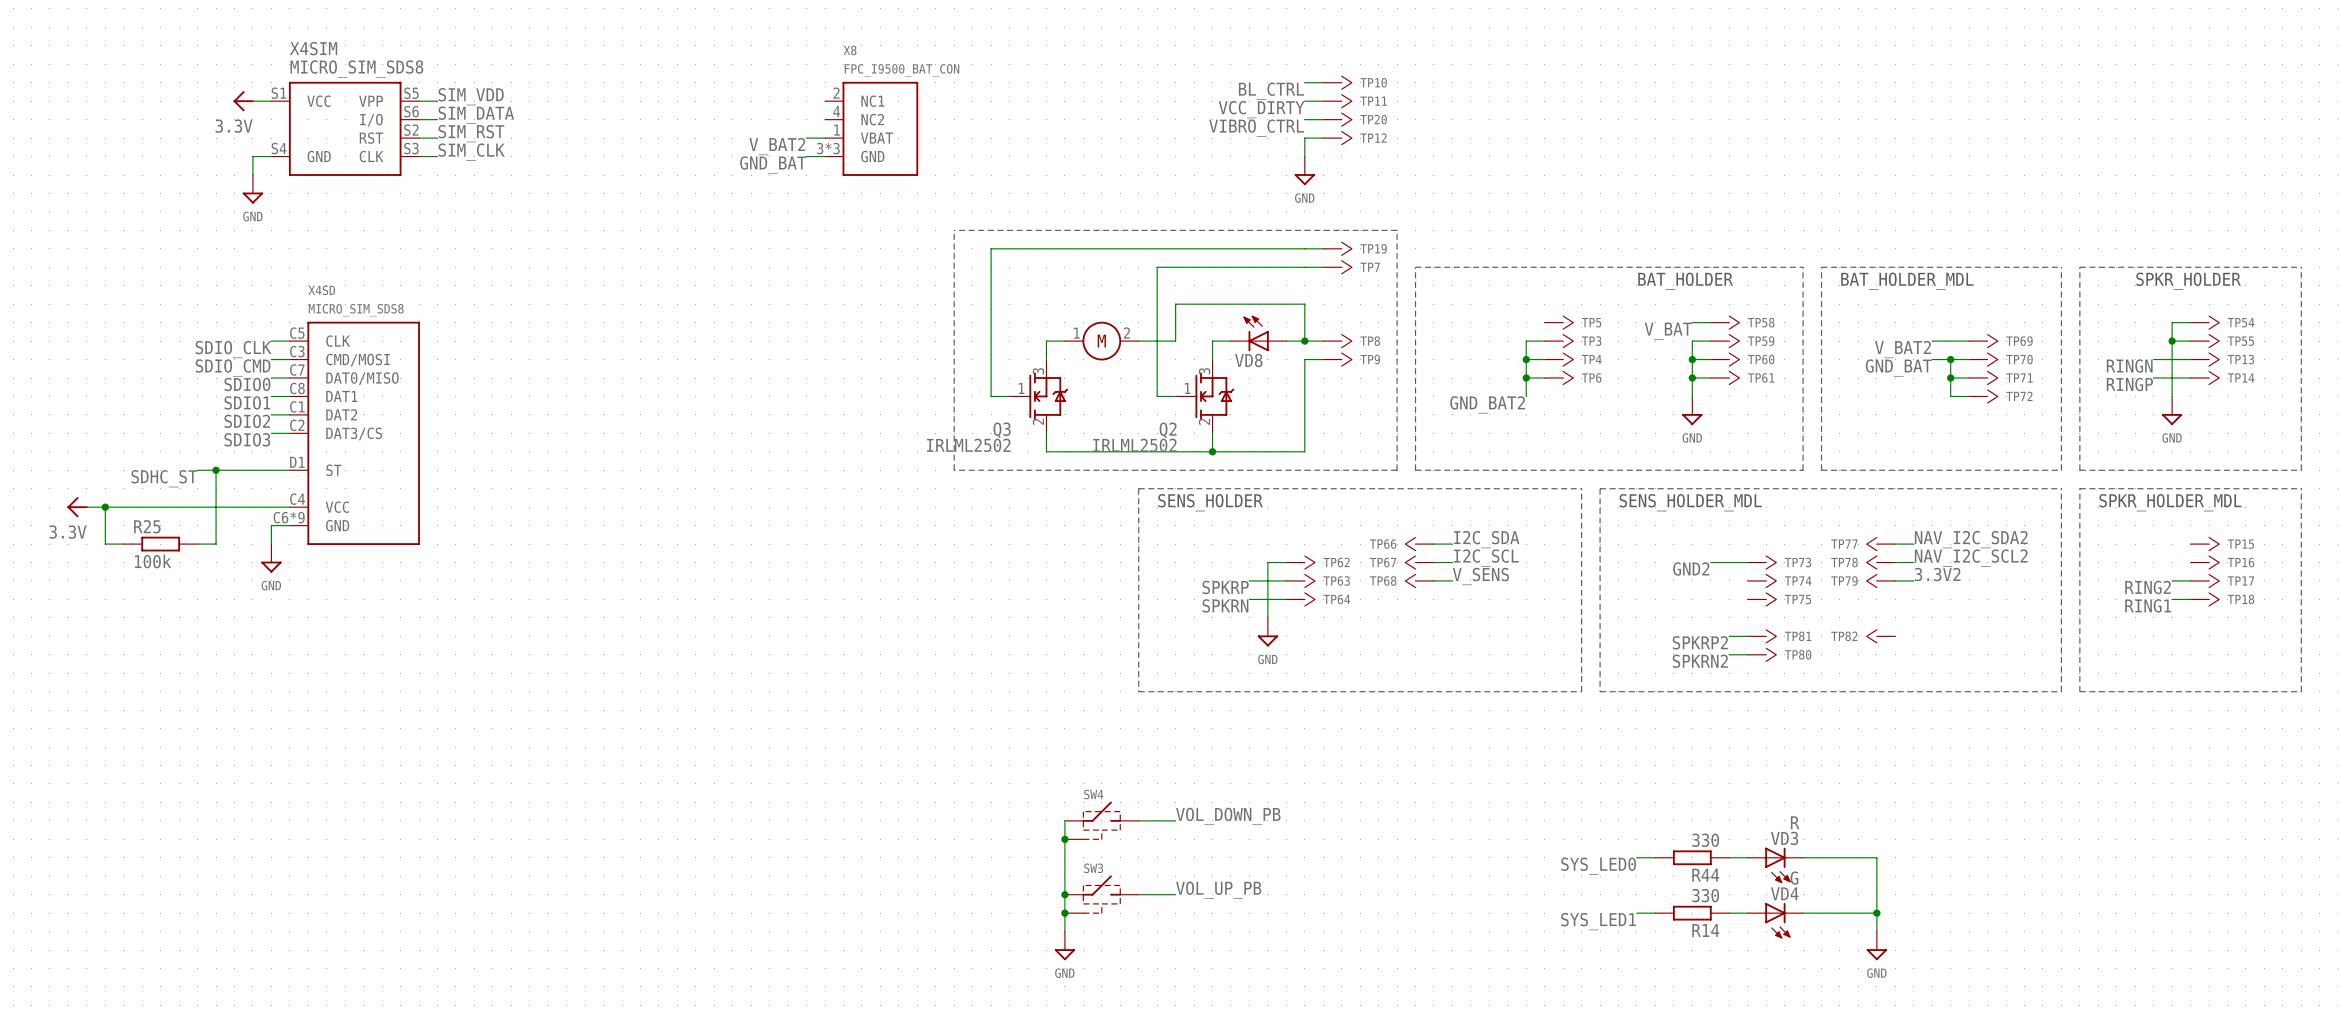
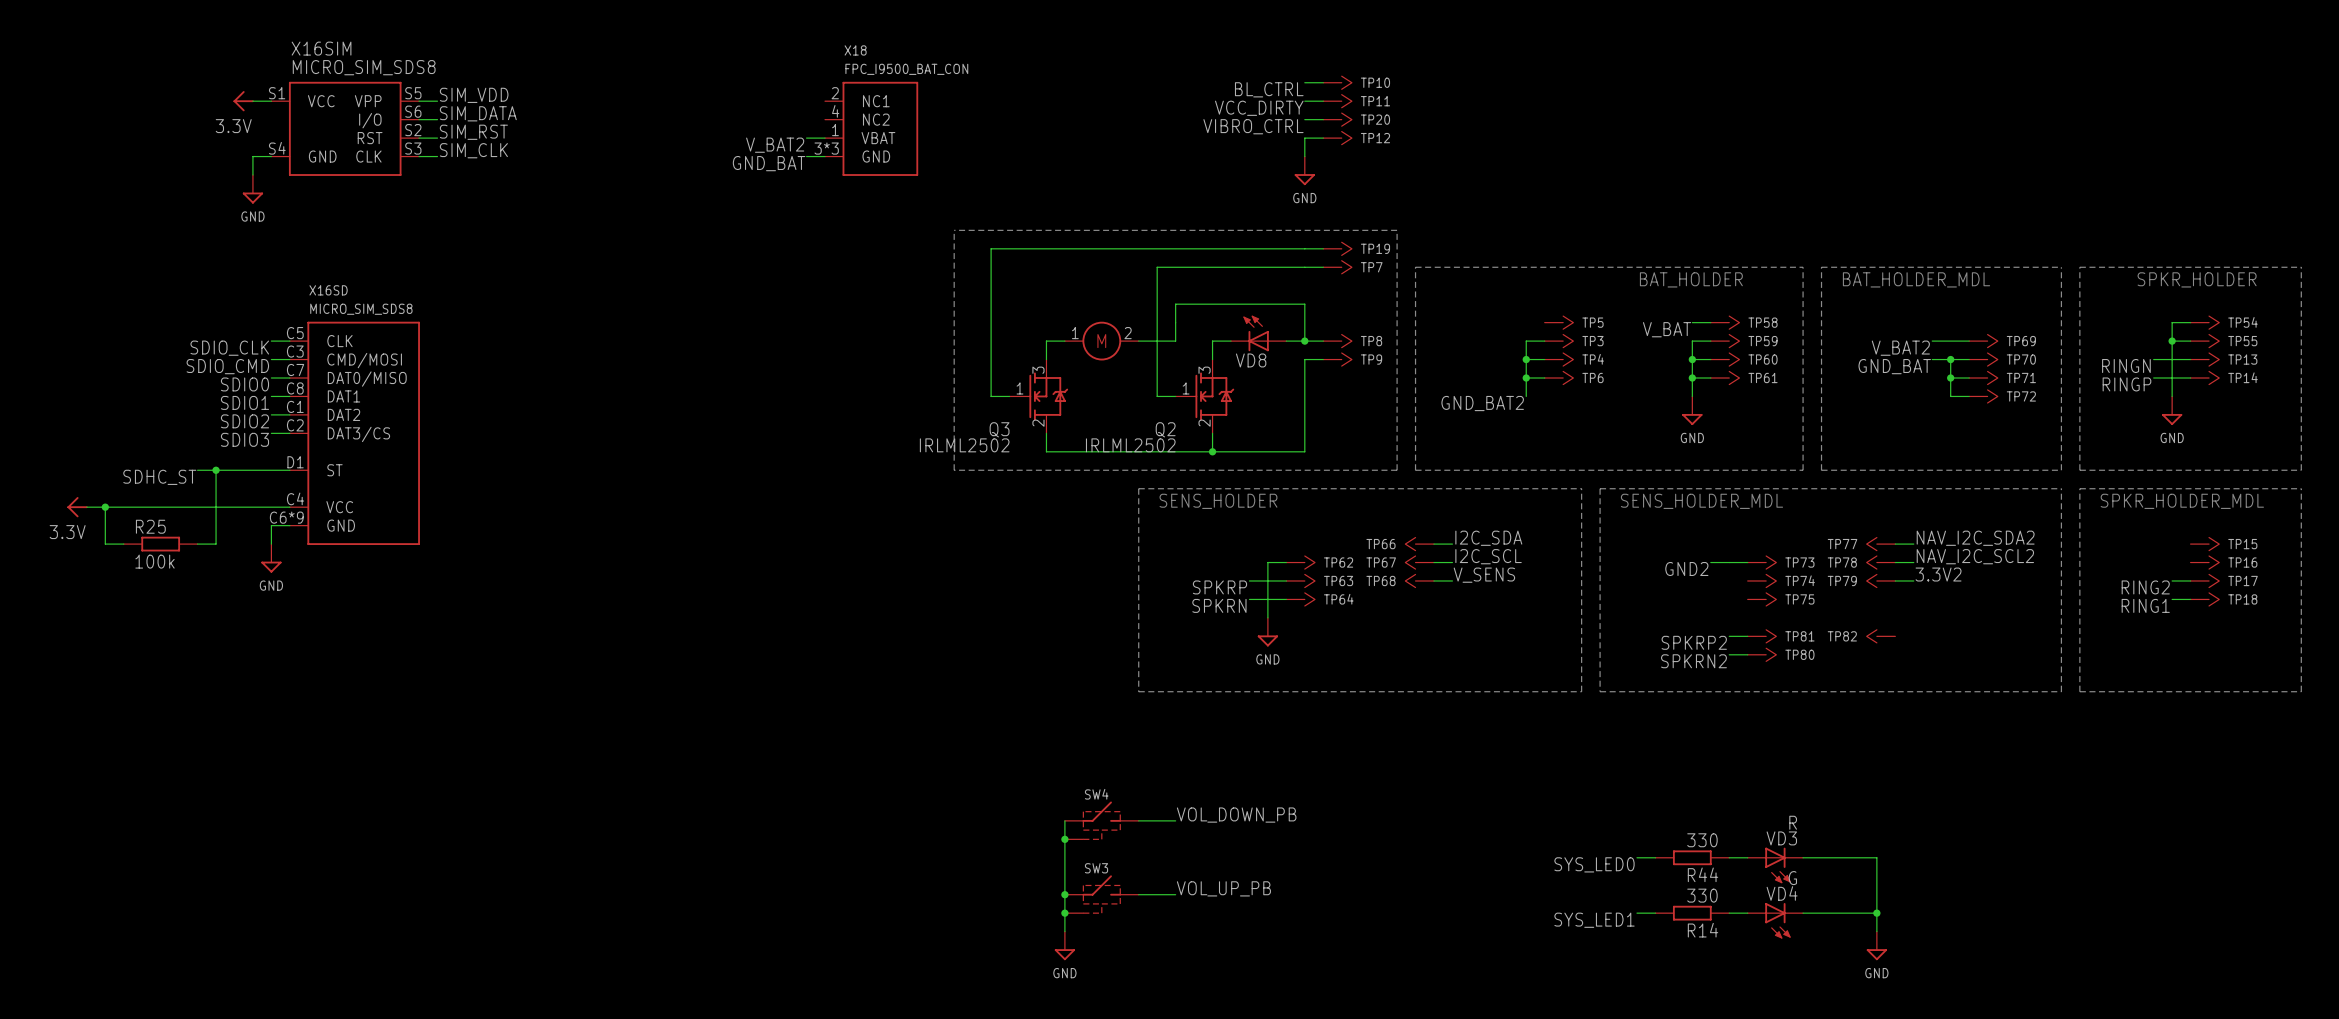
X4SIM name: X4SIM (313, 48) -> X16SIM (321, 48)
X8 name: X8 (850, 50) -> X18 (855, 50)
X4SD name: X4SD (321, 290) -> X16SD (328, 290)

